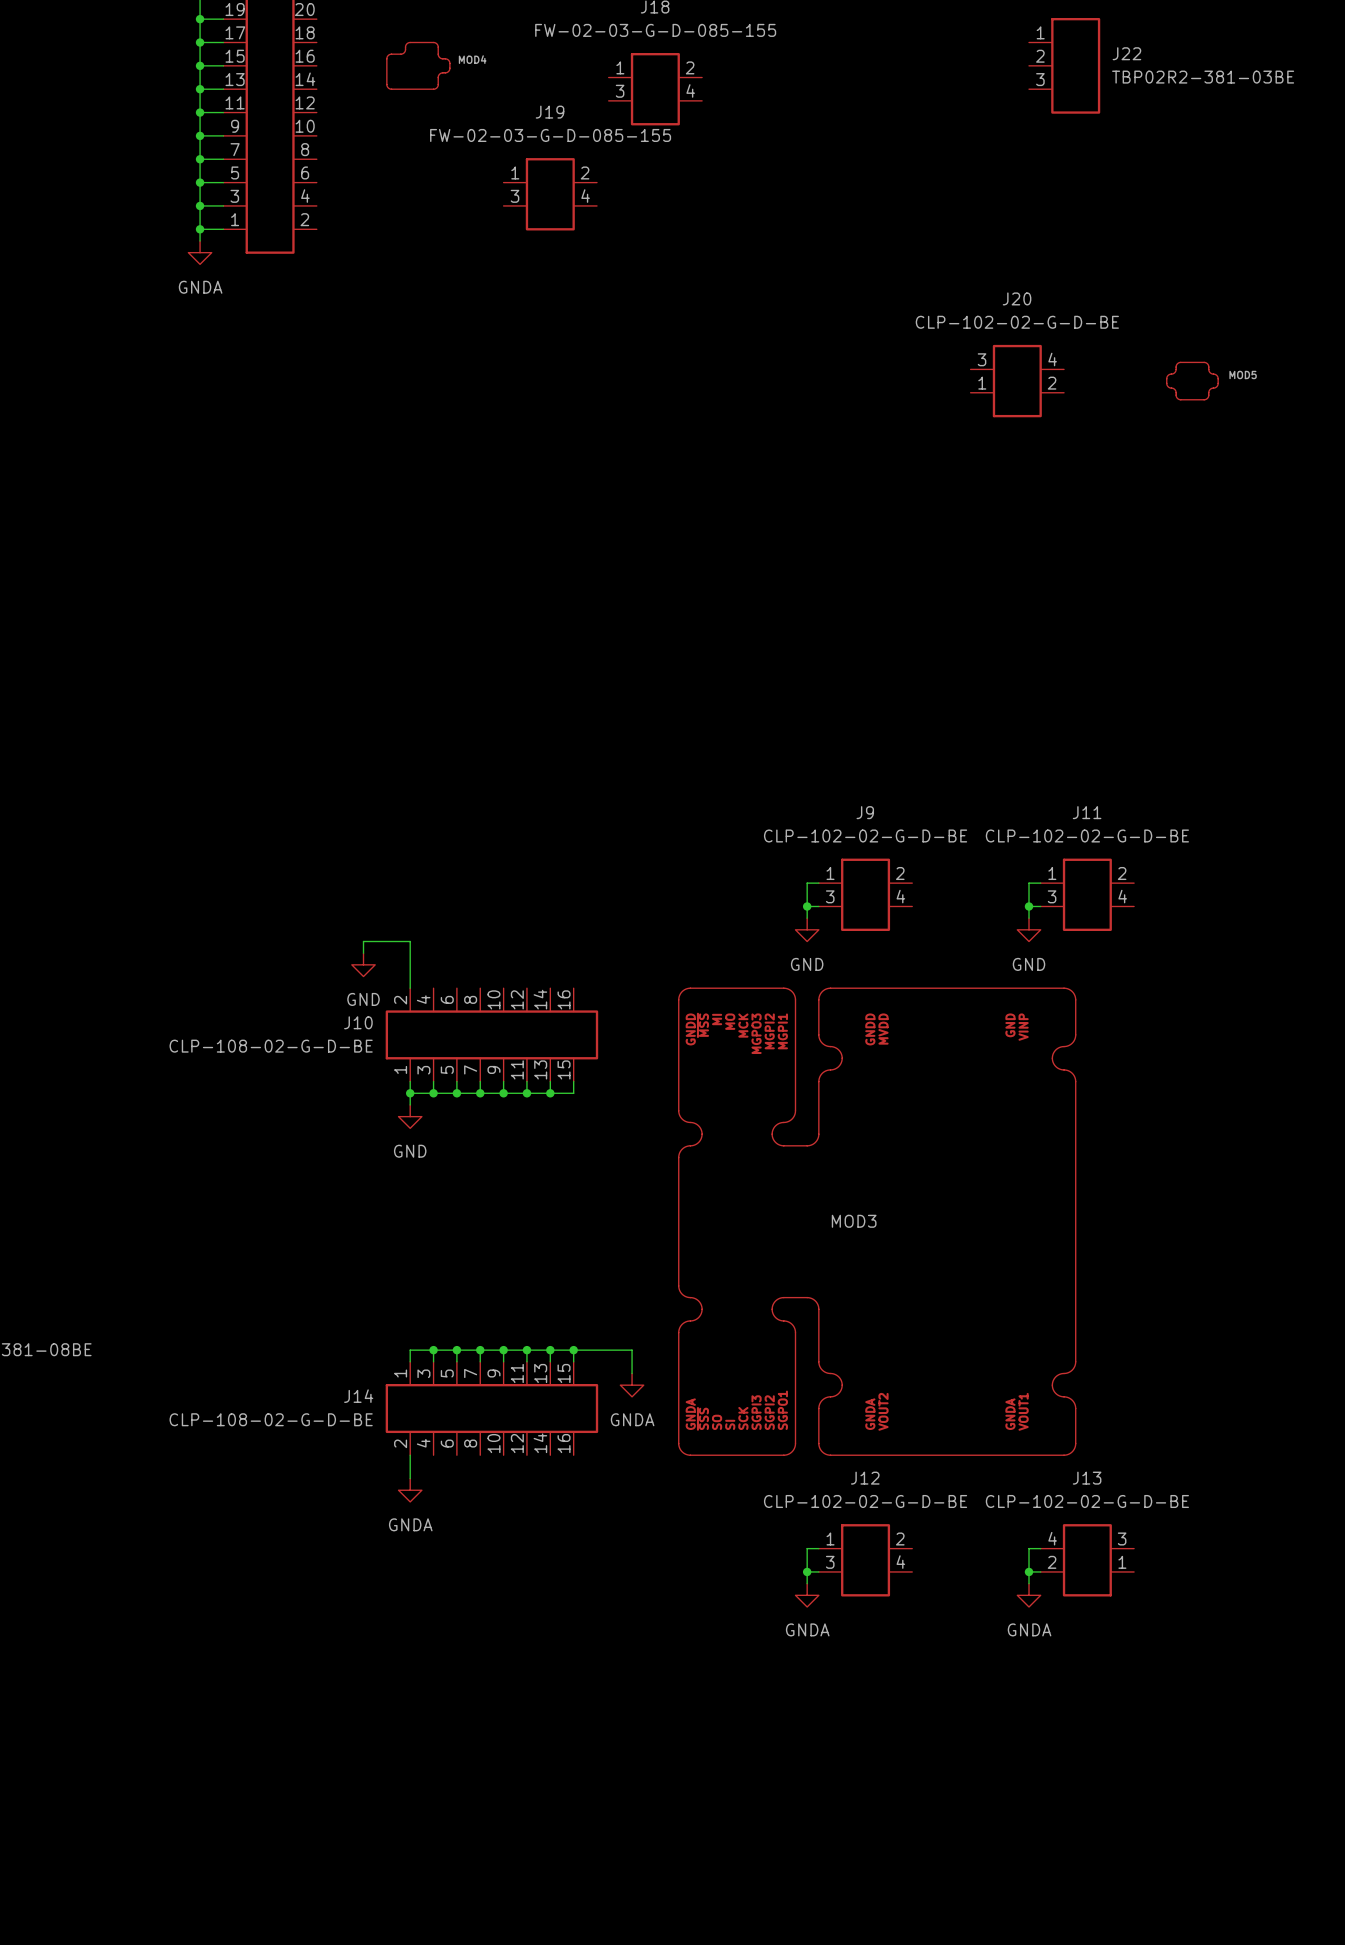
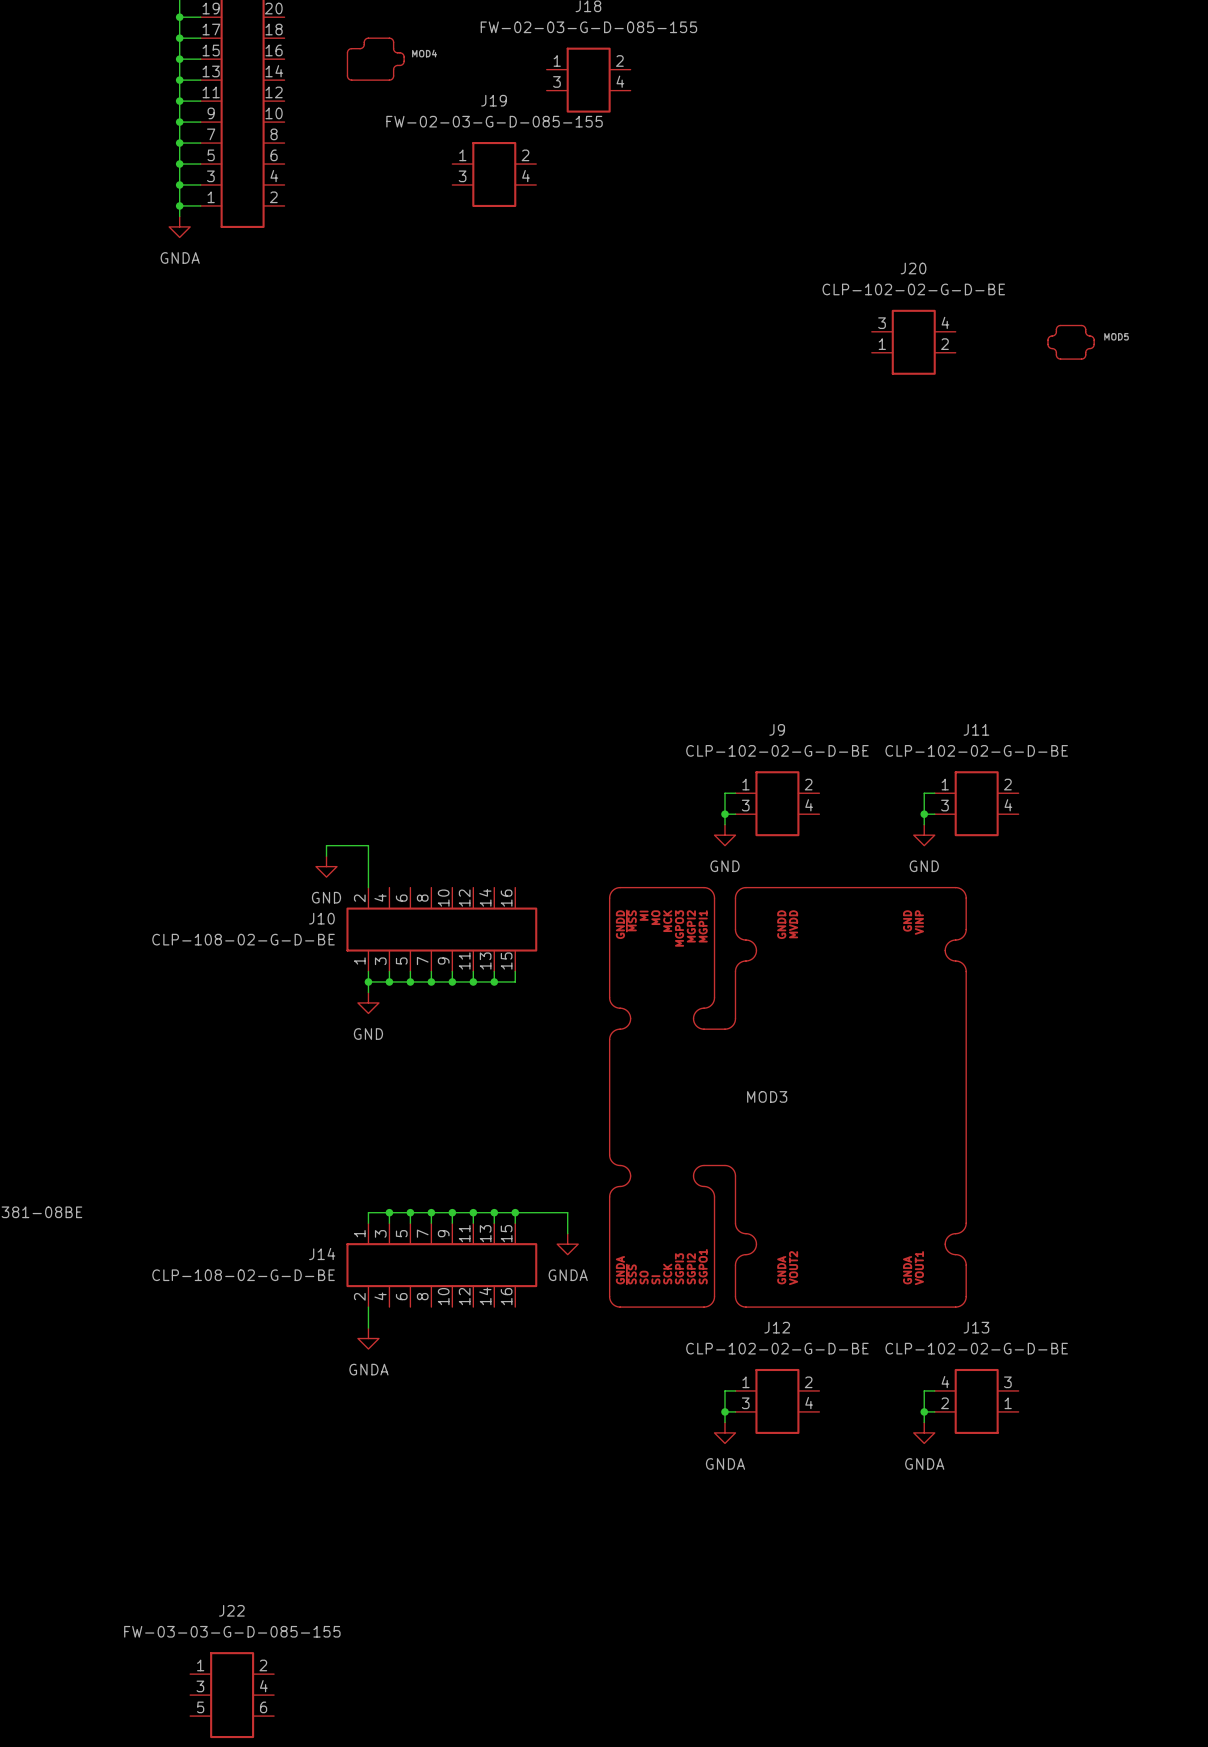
J22 symbol: [1029, 17, 1101, 114] -> [190, 1652, 275, 1739]
J22 name position: J22 (1126, 53) -> J22 (231, 1610)
J22 value: TBP02R2-381-03BE (1203, 77) -> FW-03-03-G-D-085-155 (232, 1631)

